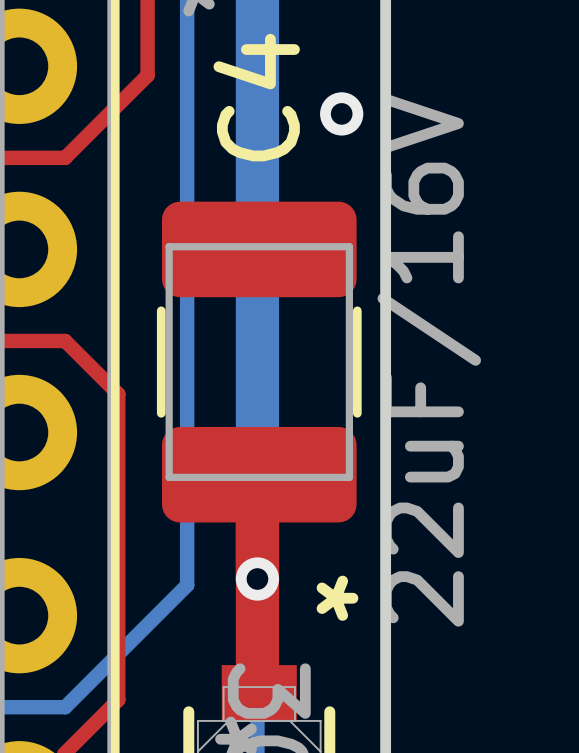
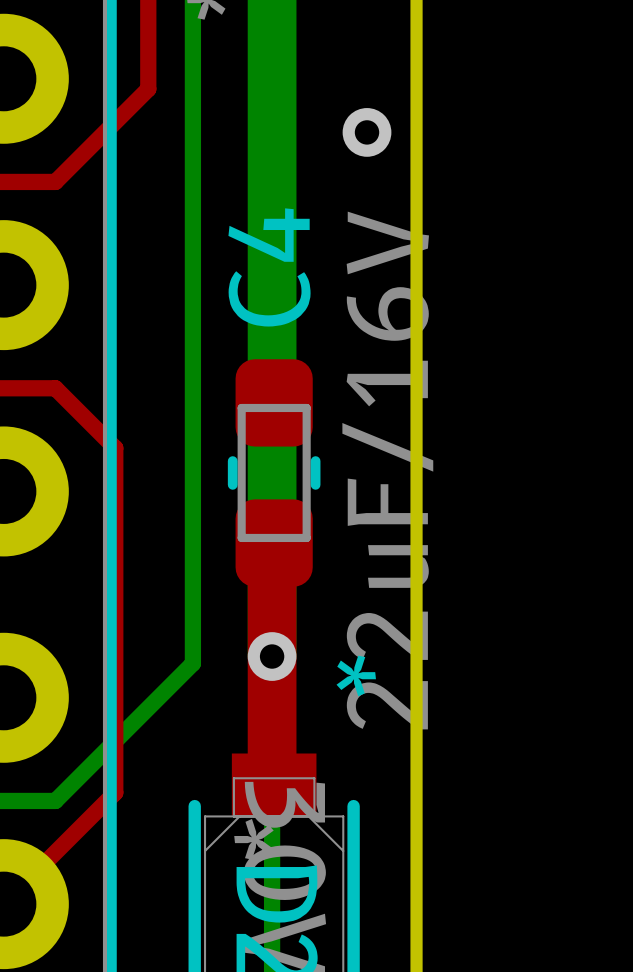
C4 footprint: [156, 201, 362, 523] -> [227, 359, 321, 587]

